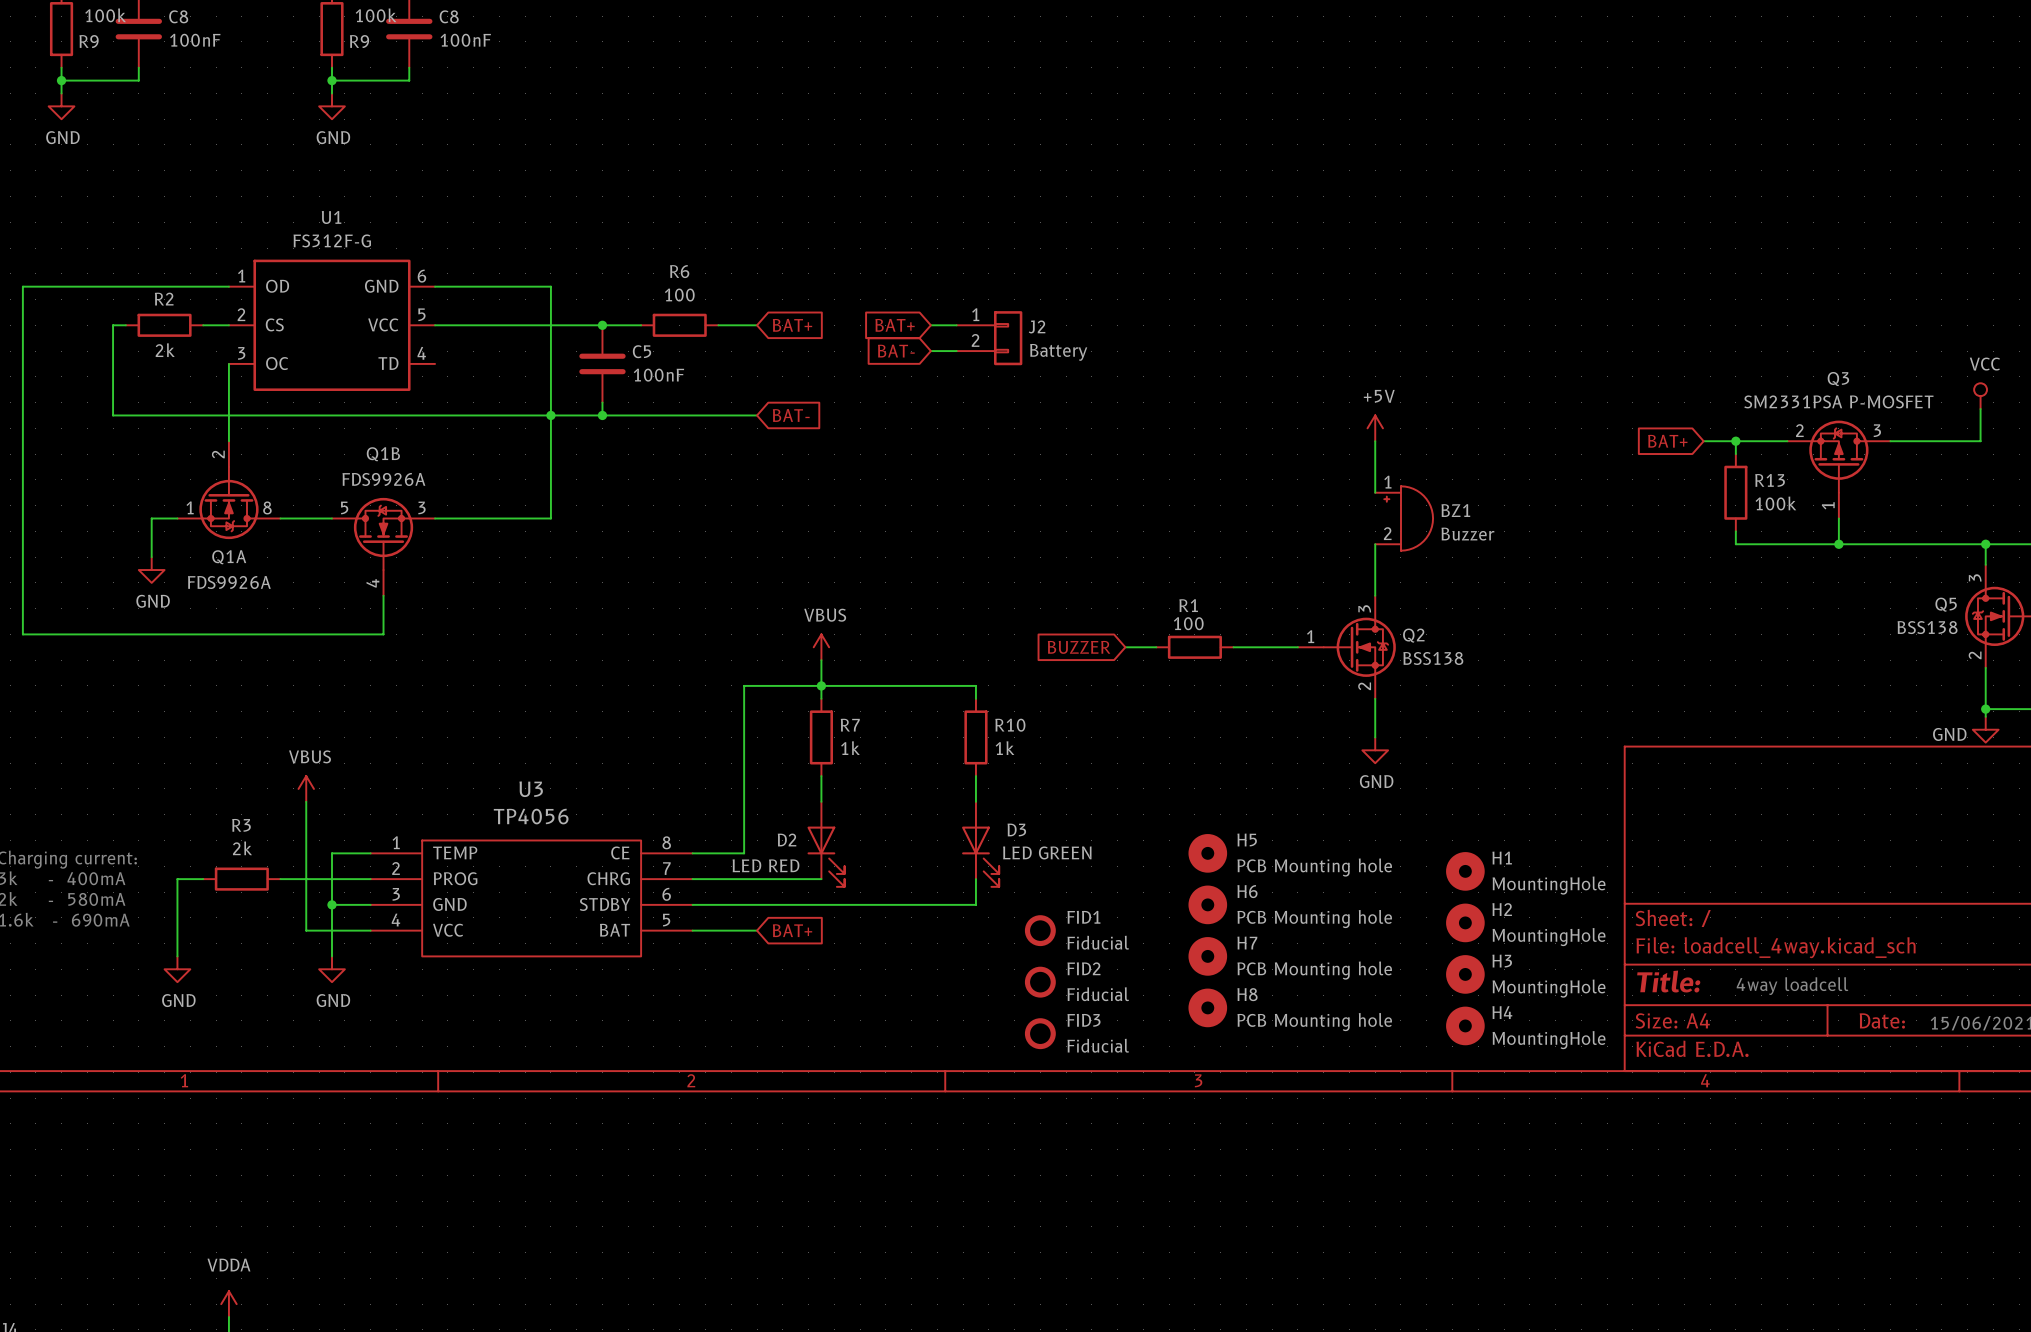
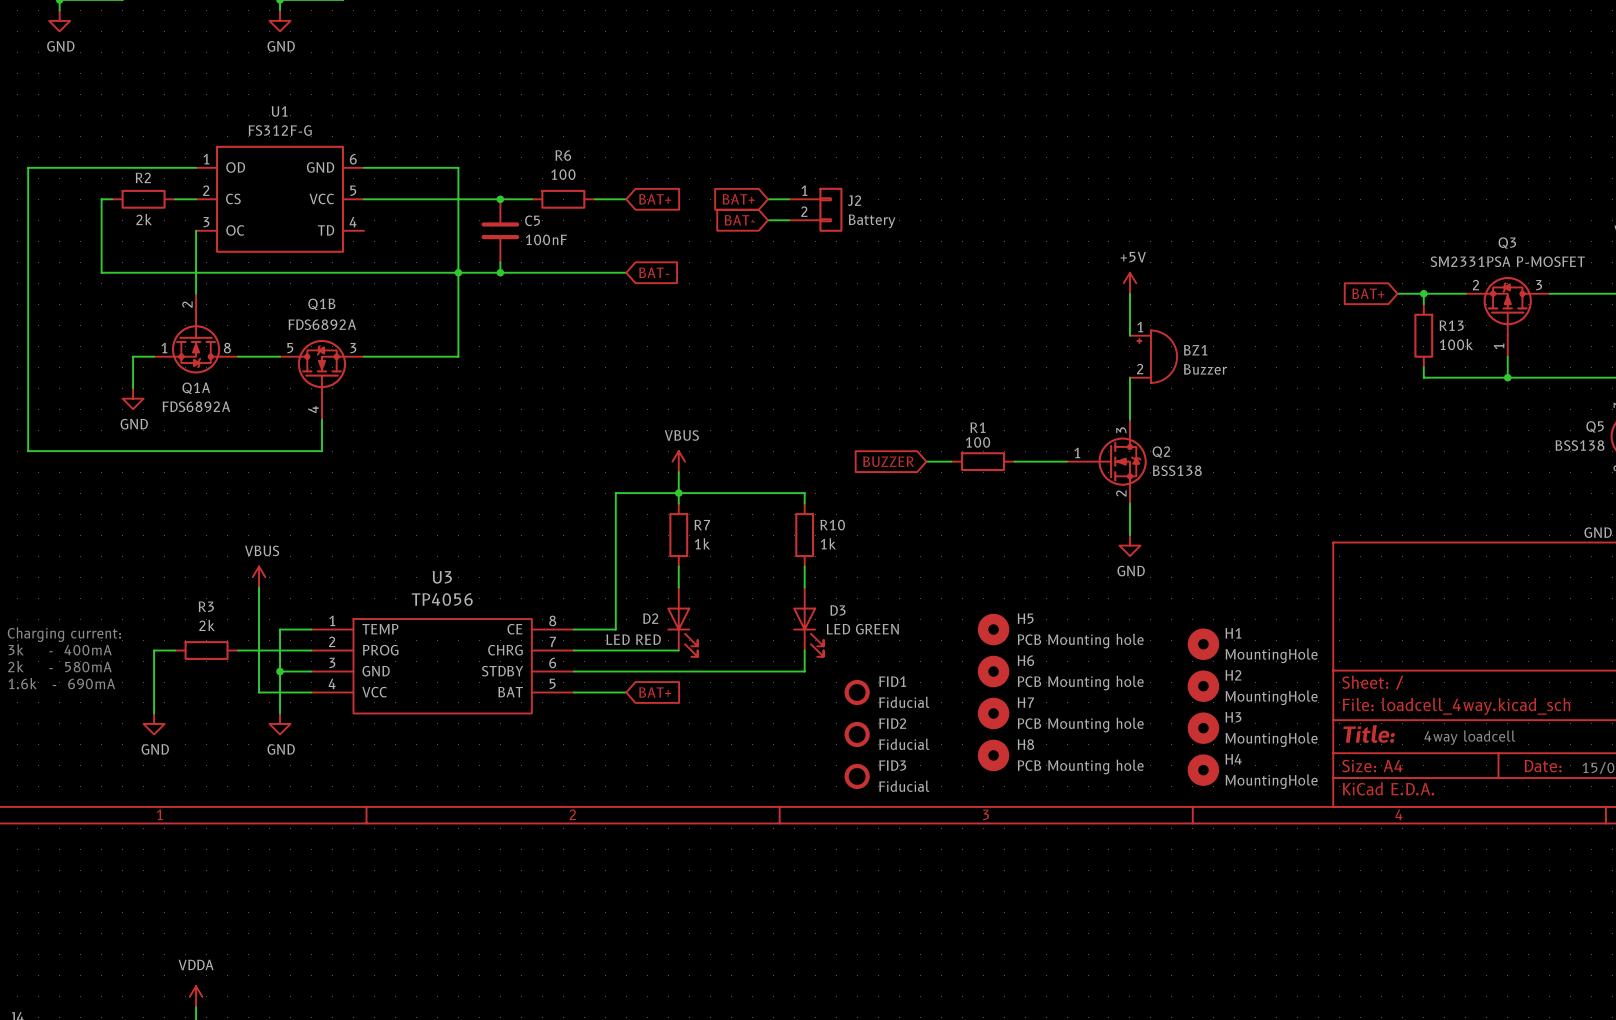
Q1B value: FDS9926A (383, 479) -> FDS6892A (322, 324)
Q1A value: FDS9926A (229, 582) -> FDS6892A (196, 406)

